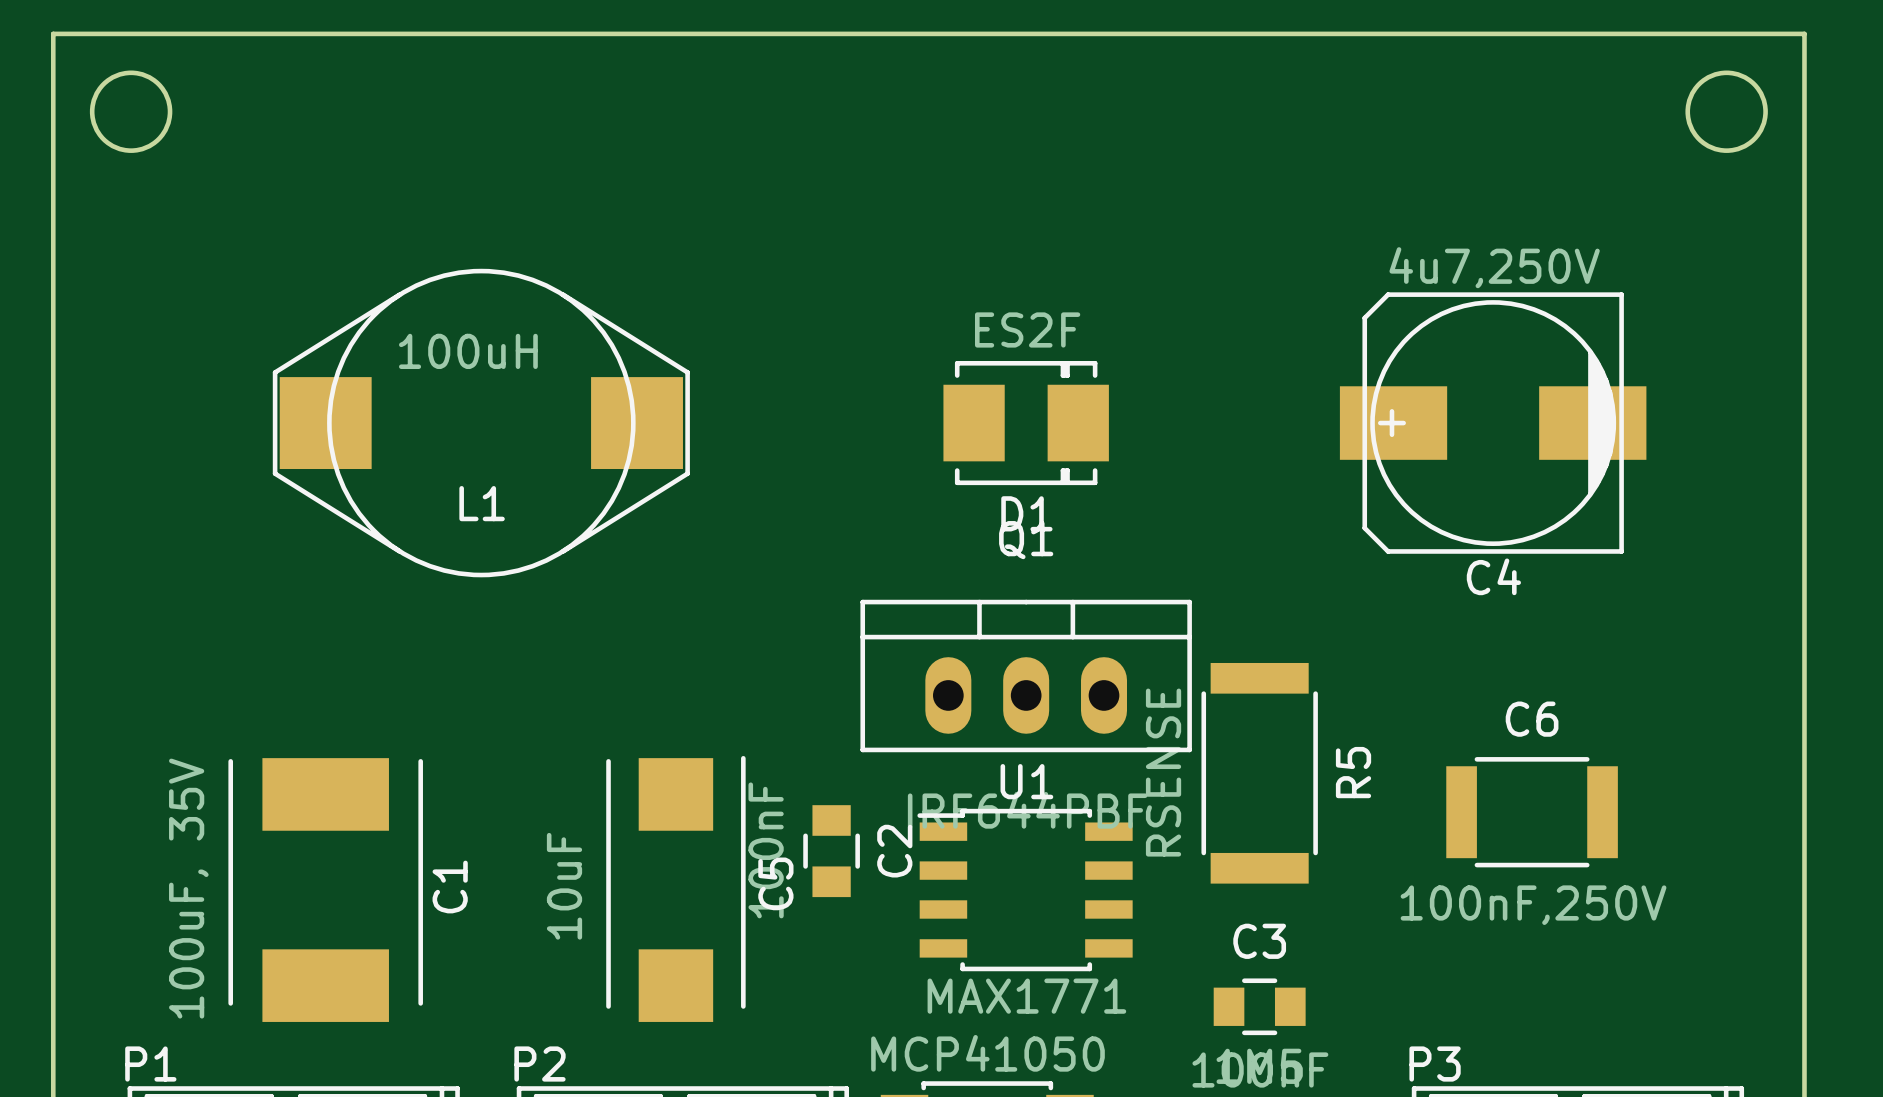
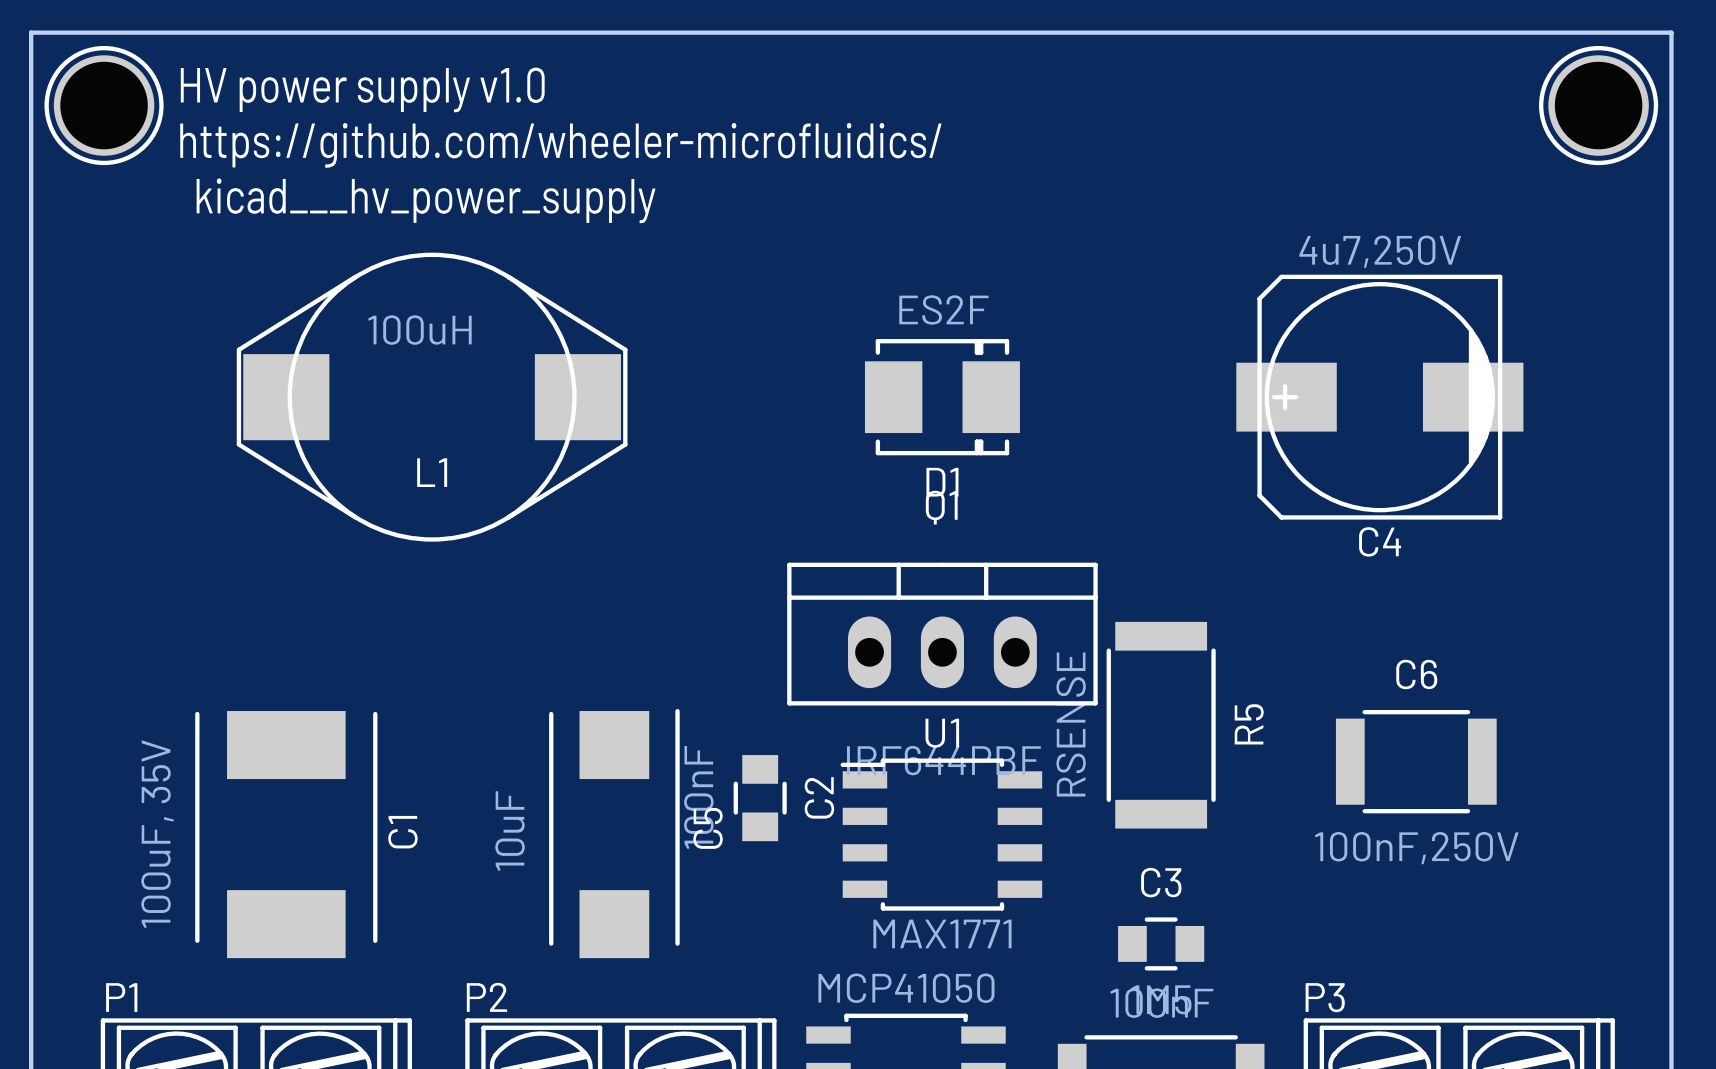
round board edge: [89, 70, 173, 153] -> none
round board edge: [1685, 70, 1768, 153] -> none
text: none -> HV power supply v1.0 (362, 89)
part: none -> (104, 105)
part: none -> (1598, 105)
text: none -> https://github.com/wheeler-microfluidics/ (560, 145)
text: none -> kicad___hv_power_supply (426, 200)

